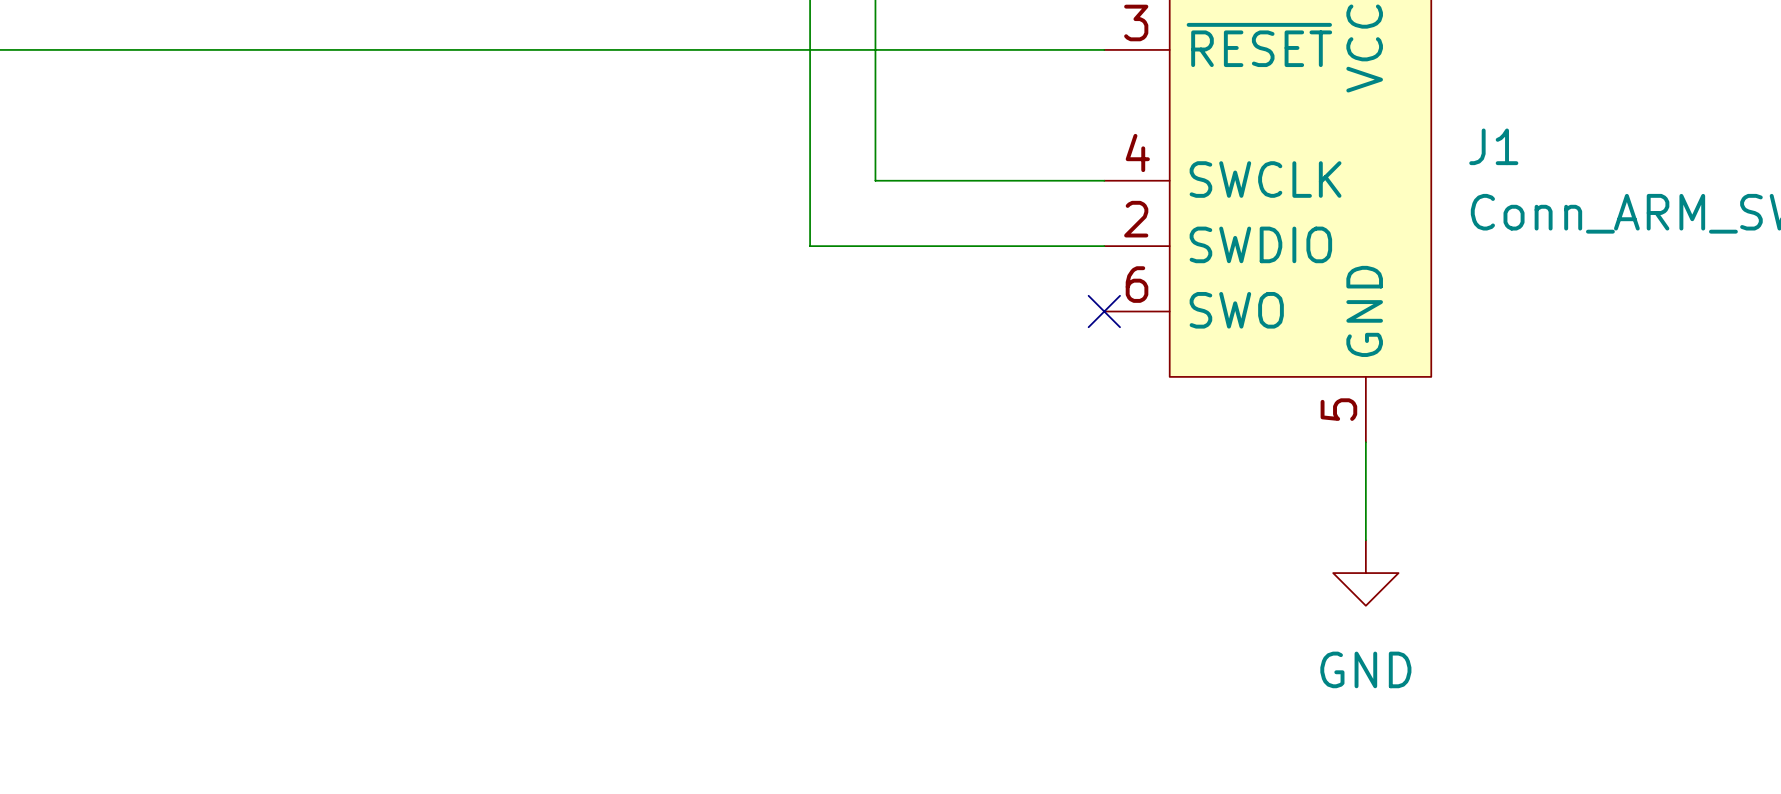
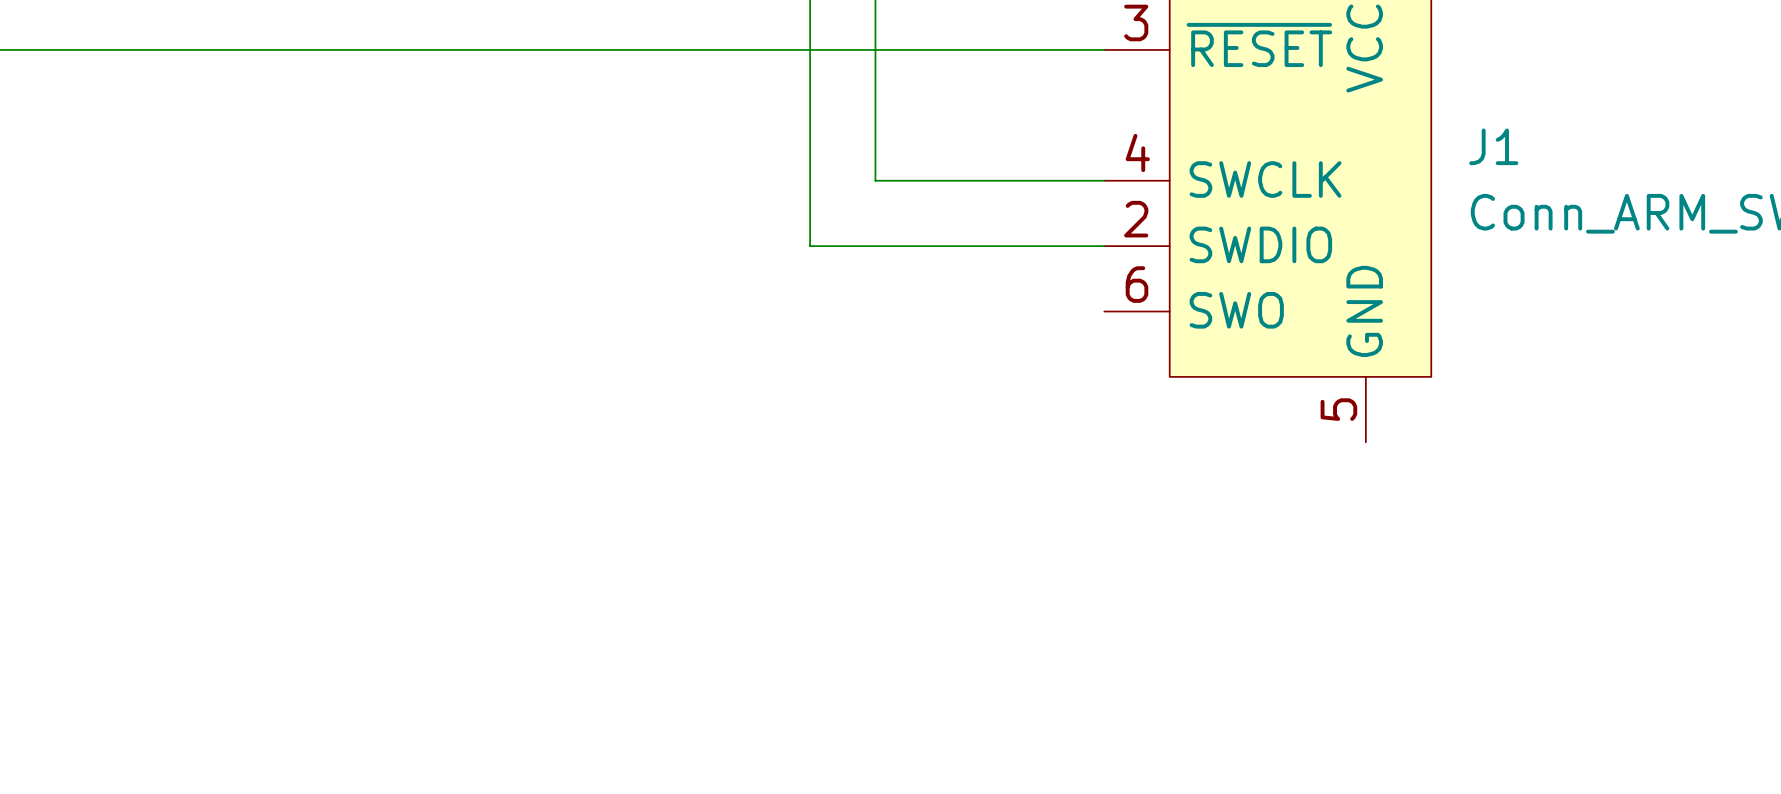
no-connect mark: (1104, 311) -> none
wire: (1365, 442) (1365, 540) -> none
power symbol: GND (1365, 573) -> none

